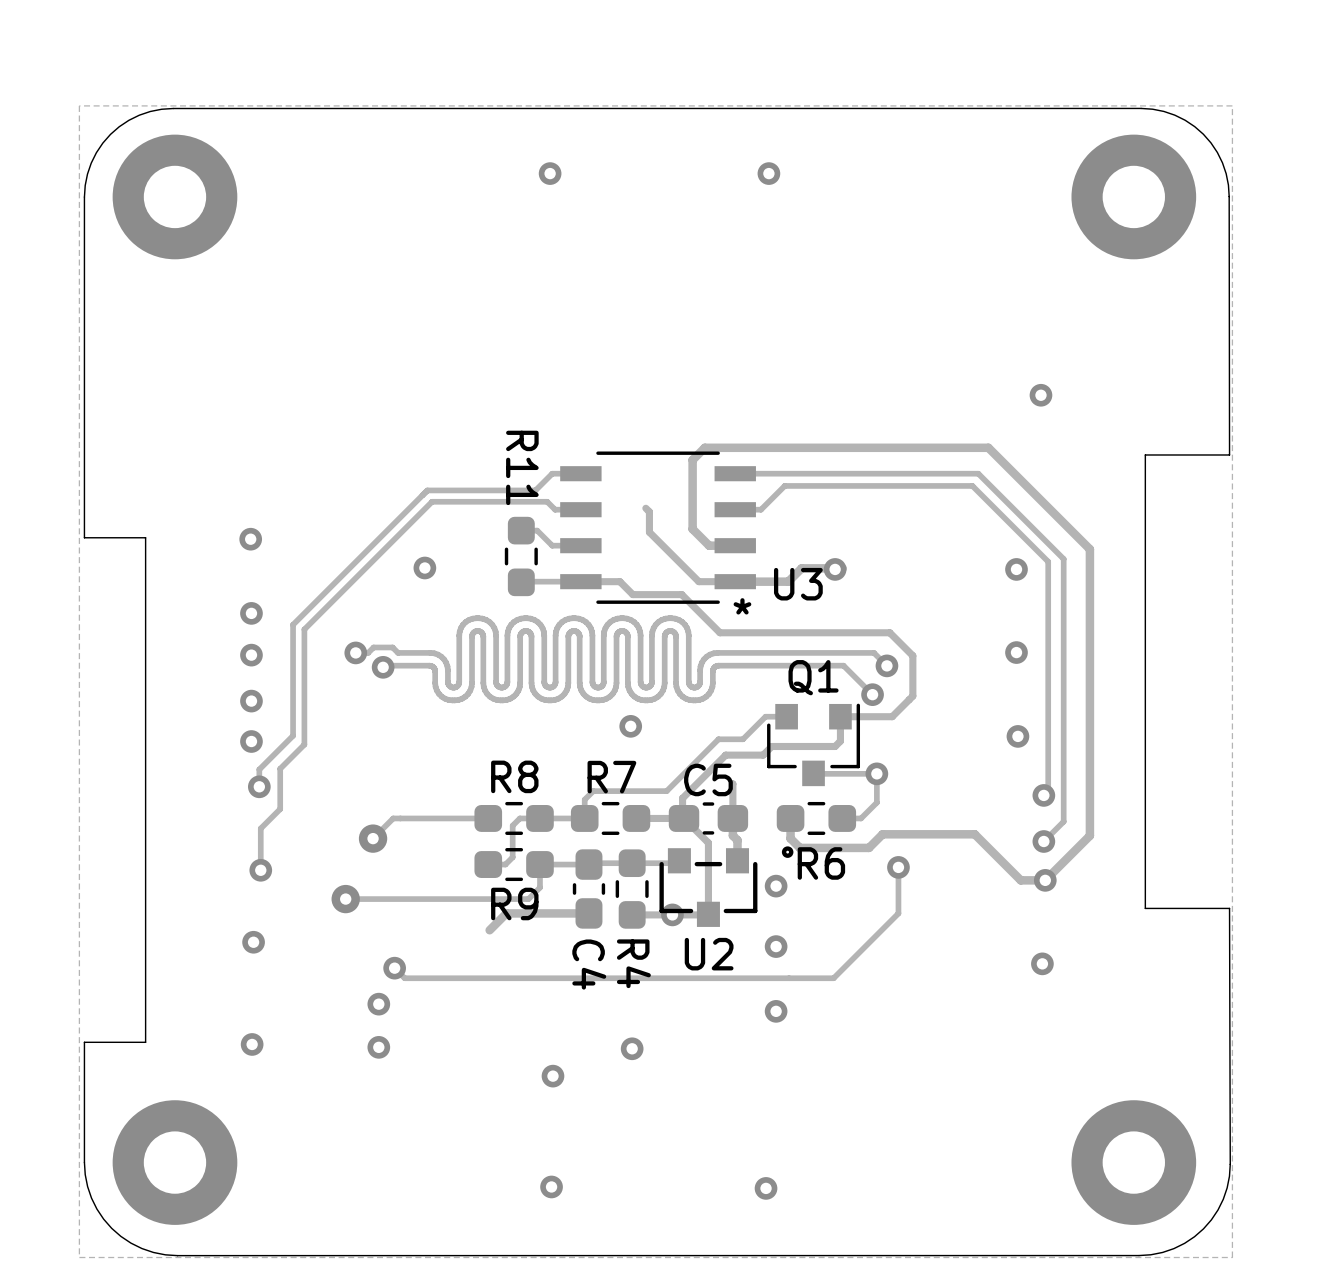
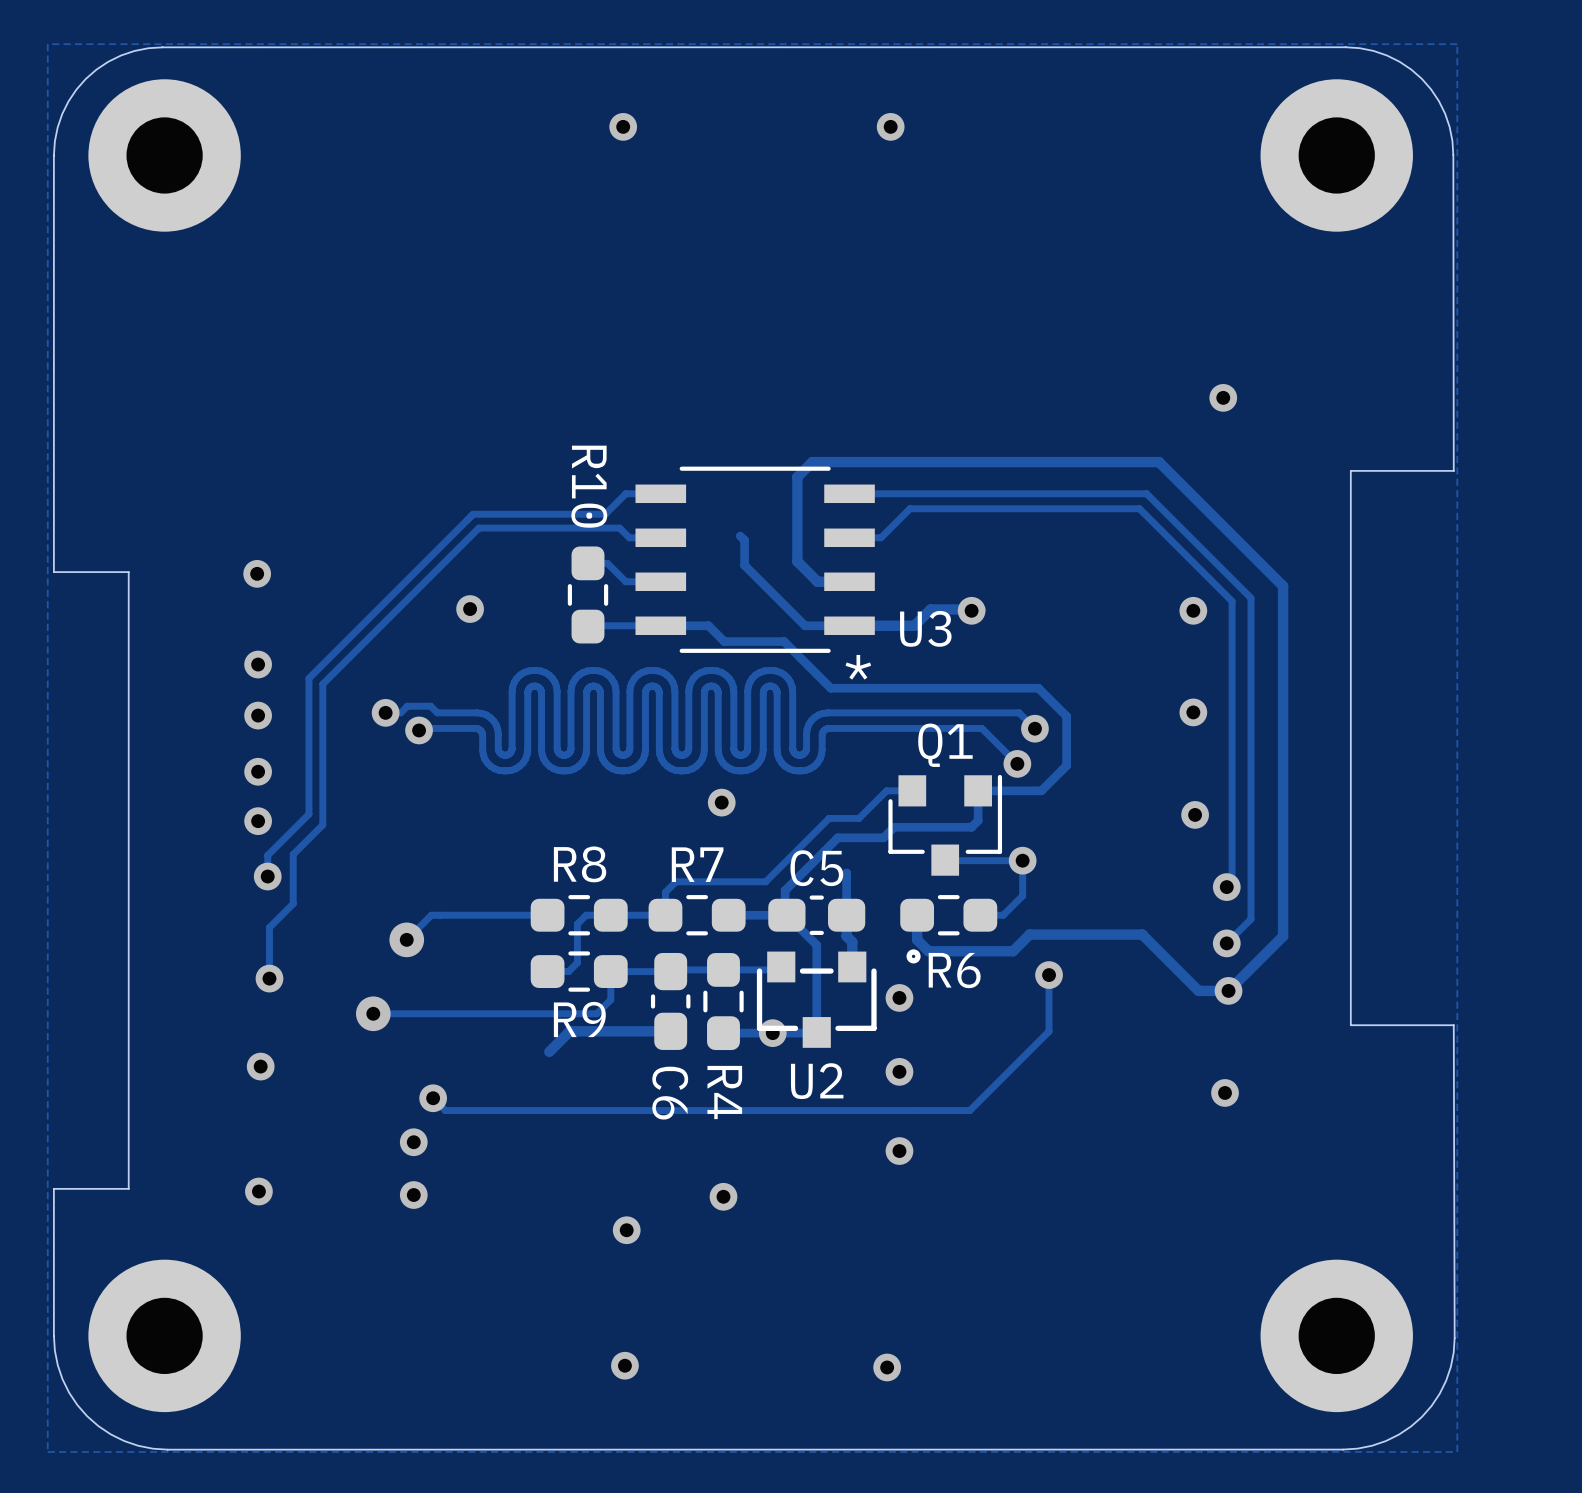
R11 name: R11 (522, 467) -> R10 (589, 486)
C4 name: C4 (589, 964) -> C6 (670, 1093)

